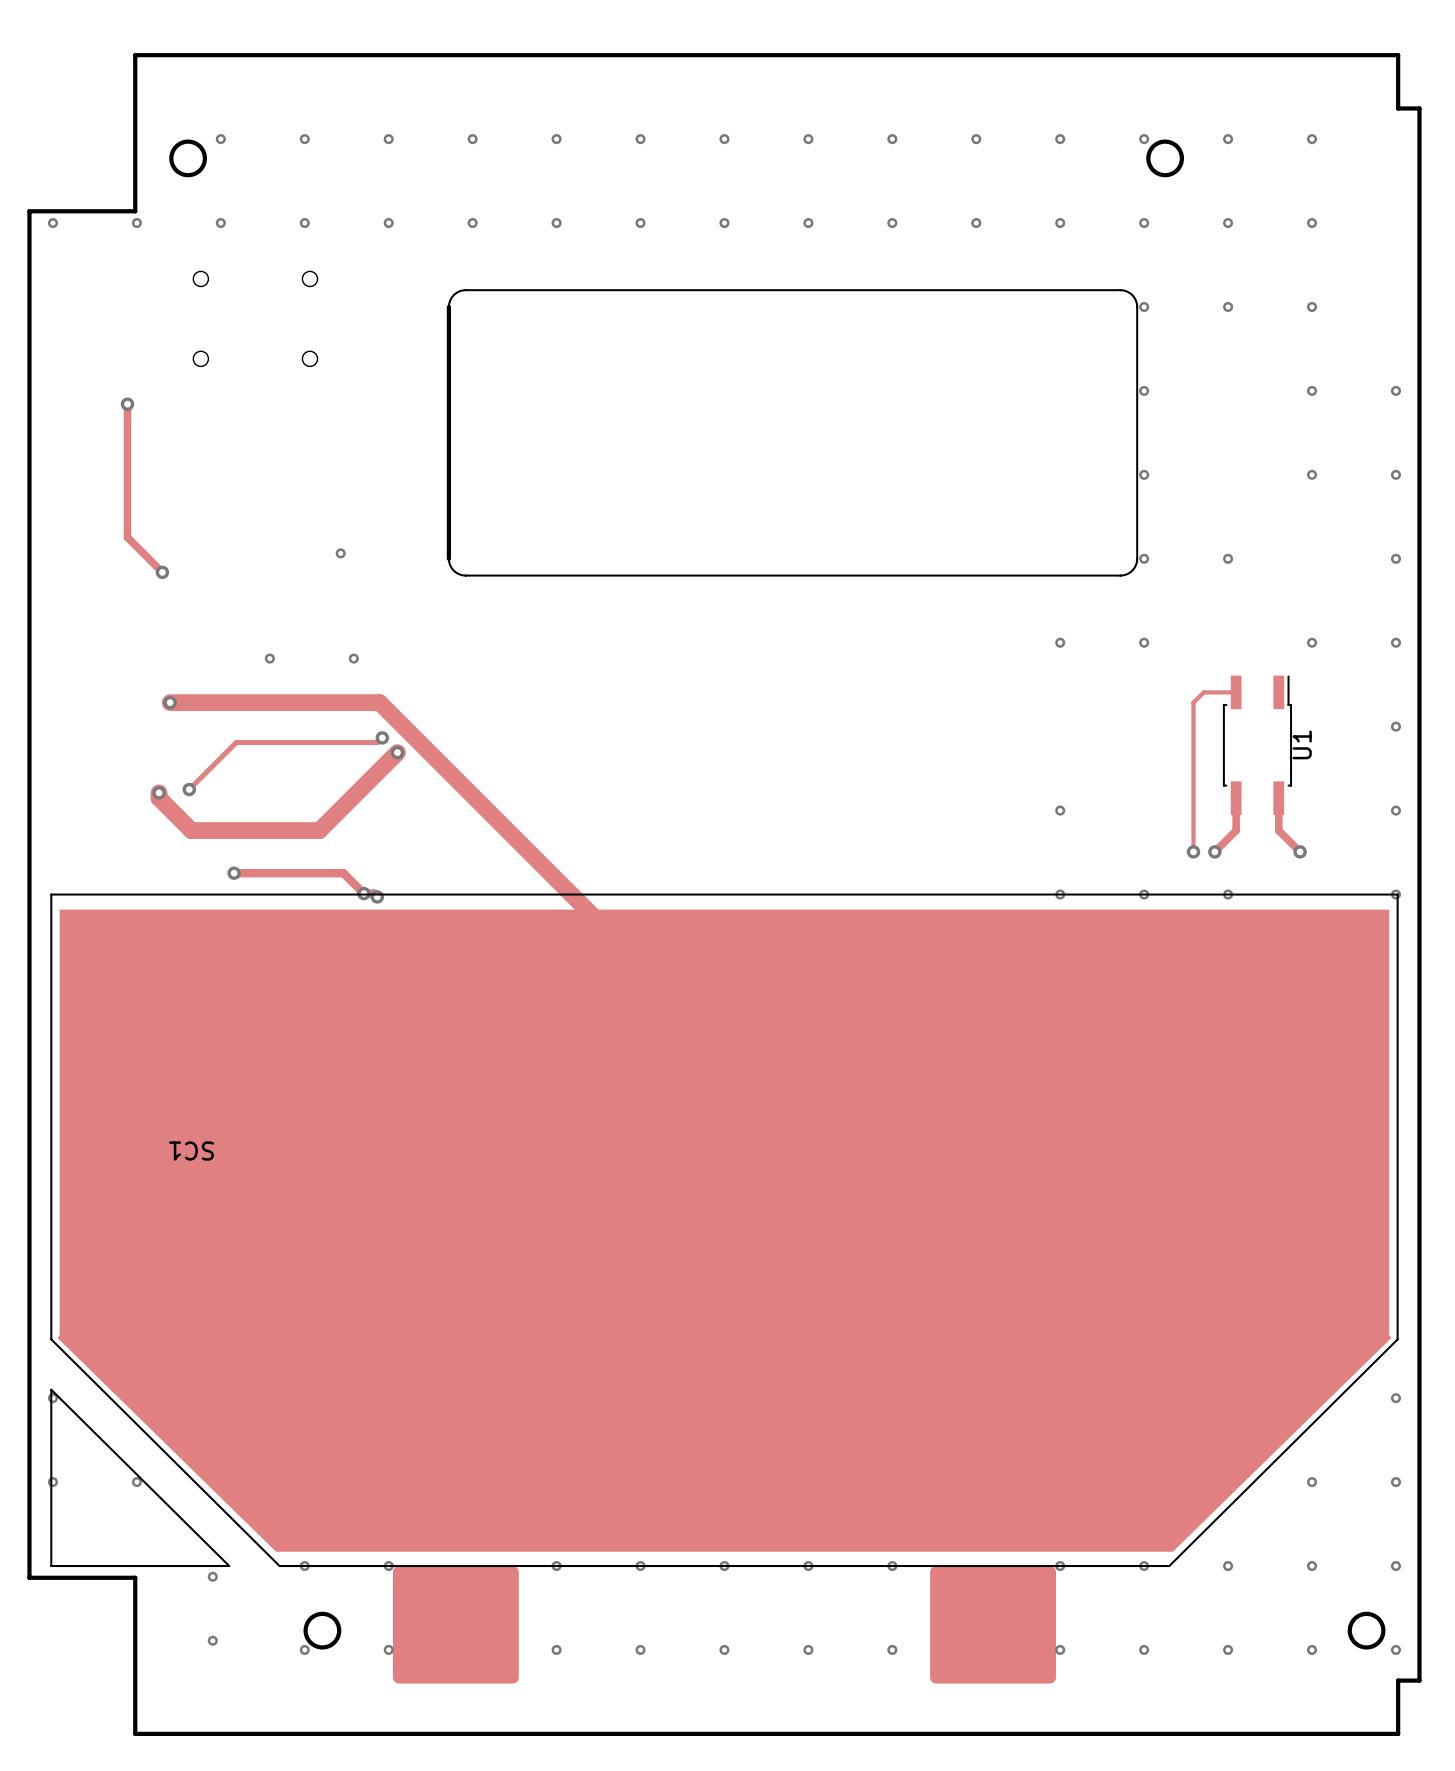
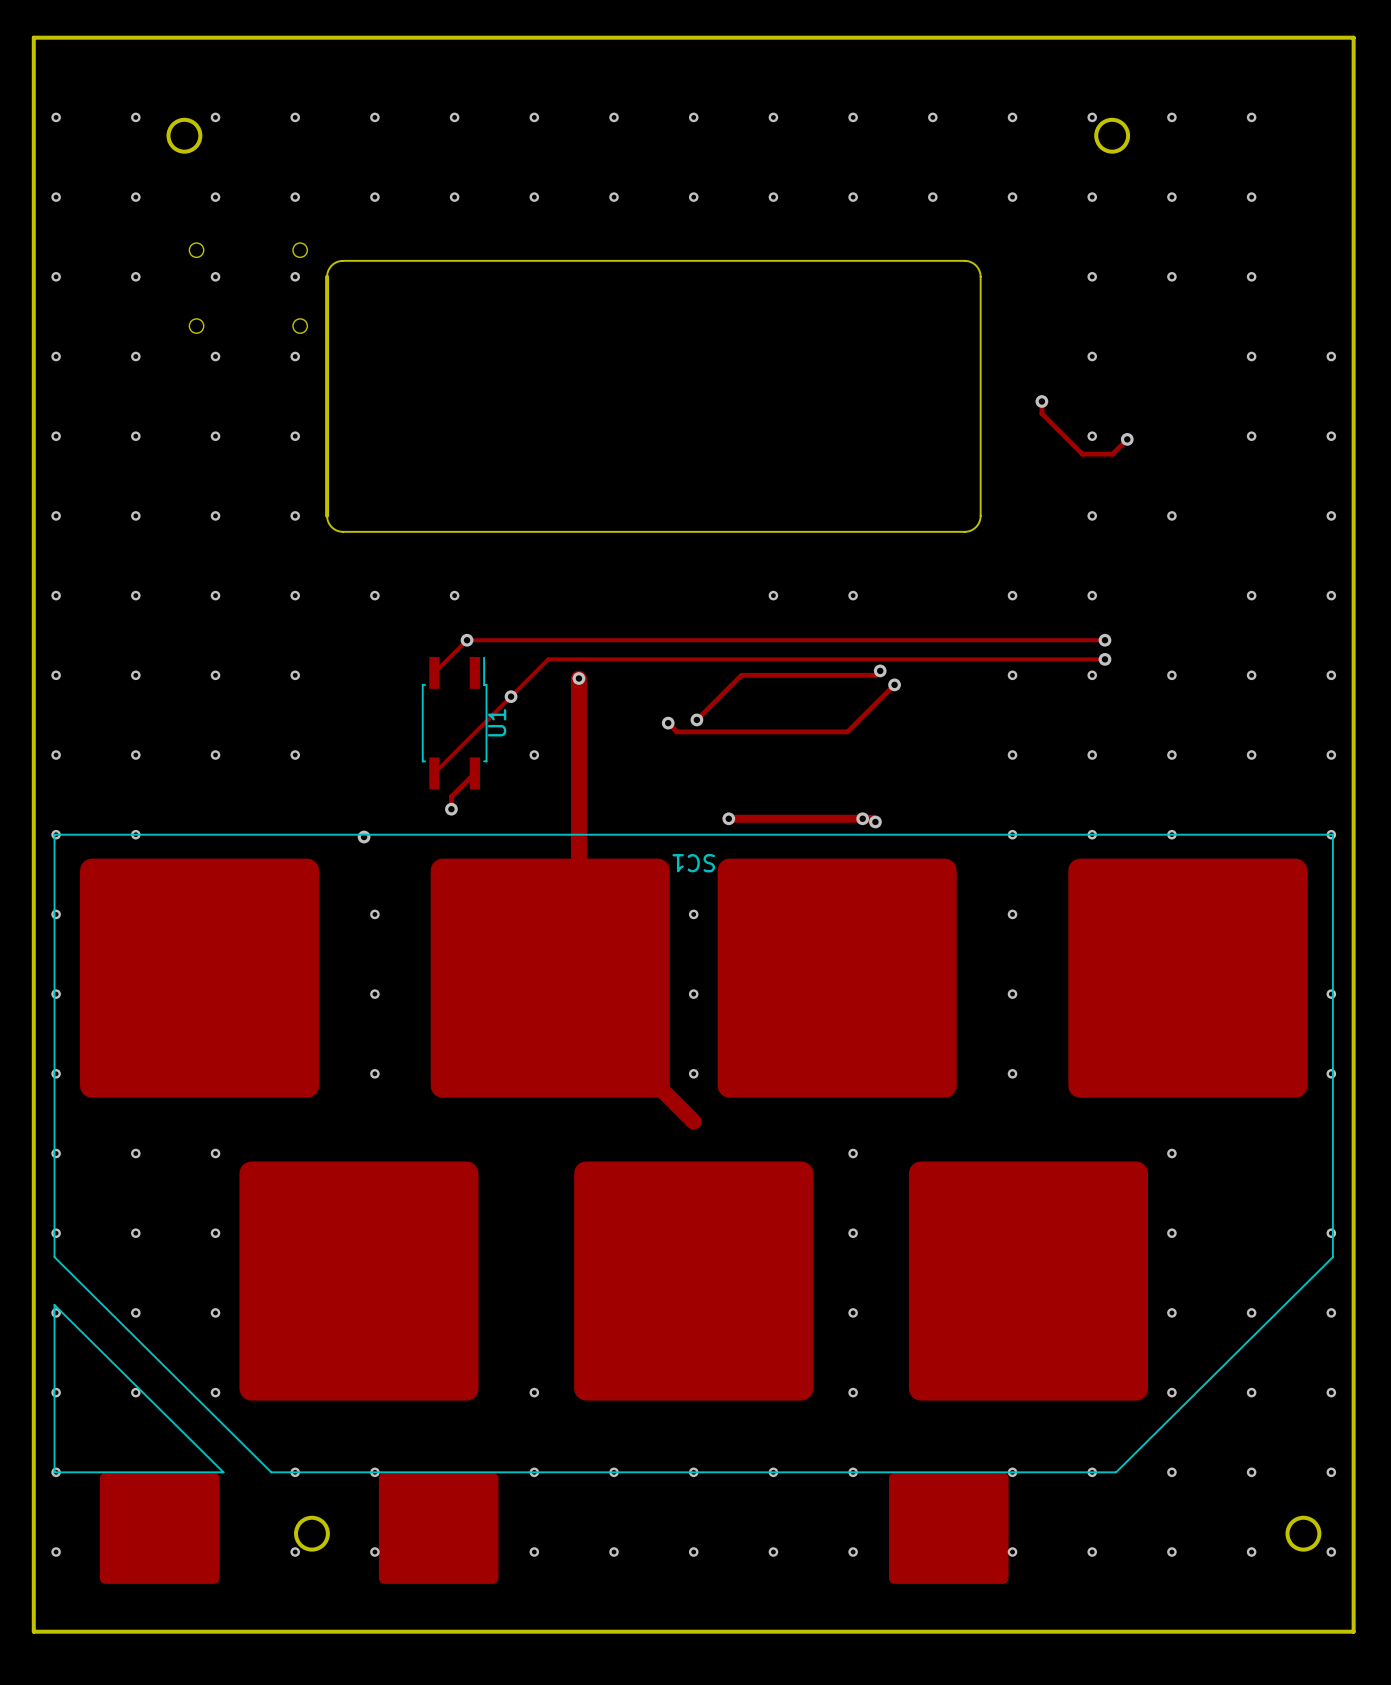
drawing shape: [27, 53, 1422, 1736] -> [31, 35, 1356, 1634]
via: none -> (56, 117)
via: none -> (135, 117)
via: none -> (56, 276)
via: none -> (135, 276)
via: none -> (215, 276)
via: none -> (295, 276)
via: none -> (56, 356)
via: none -> (135, 356)
via: none -> (215, 356)
via: none -> (295, 356)
track: (127, 404) (127, 537) (162, 572) -> none
via: (127, 404) -> none
track: none -> (1041, 401) (1041, 413) (1082, 454) (1112, 454) (1127, 439)
via: none -> (1041, 401)
via: none -> (56, 436)
via: none -> (135, 436)
via: none -> (215, 436)
via: none -> (295, 436)
via: none -> (1127, 439)
via position: (340, 553) -> (295, 515)
via: none -> (56, 515)
via: none -> (135, 515)
via: none -> (215, 515)
via: (162, 572) -> none
via: none -> (56, 595)
via: none -> (135, 595)
via: none -> (215, 595)
via: none -> (295, 595)
via: none -> (374, 595)
via: none -> (454, 595)
via: none -> (773, 595)
via: none -> (853, 595)
via: (269, 658) -> none
via: (353, 658) -> none
via: none -> (467, 640)
track: none -> (1104, 640) (467, 640) (434, 672)
via: none -> (1104, 640)
track: (1236, 692) (1203, 692) (1193, 702) (1193, 851) -> none
track: (170, 702) (379, 702) (724, 1047) (724, 1123) -> none
via: (170, 702) -> none
track: none -> (1104, 659) (548, 659) (434, 773)
via: none -> (1104, 659)
track: none -> (880, 670) (875, 675) (741, 675) (696, 719)
via: none -> (880, 670)
via: none -> (56, 675)
via: none -> (135, 675)
via: none -> (215, 675)
via: none -> (295, 675)
via: none -> (1012, 675)
via: none -> (1092, 675)
via: none -> (1171, 675)
via: none -> (1251, 675)
track: none -> (578, 678) (578, 949) (550, 978) (693, 1121)
via: none -> (578, 678)
track: none -> (894, 684) (847, 731) (676, 731) (668, 723)
via: none -> (894, 684)
track: (382, 737) (377, 742) (236, 742) (189, 789) -> none
via: (382, 737) -> none
U1 position: (1257, 745) -> (454, 723)
via: none -> (511, 696)
track: (397, 752) (319, 830) (191, 830) (159, 798) (159, 792) -> none
via: (397, 752) -> none
via: none -> (696, 719)
via: none -> (668, 723)
via: (189, 789) -> none
via: (159, 792) -> none
track: (1236, 798) (1236, 830) (1214, 851) -> none
track: (1278, 798) (1278, 830) (1300, 851) -> none
via: none -> (56, 755)
via: none -> (135, 755)
via: none -> (215, 755)
via: none -> (295, 755)
via: none -> (534, 755)
via: none -> (1092, 755)
via: none -> (1171, 755)
via: none -> (1251, 755)
track: none -> (474, 773) (451, 796) (451, 809)
via: (1193, 851) -> none
via: (1214, 851) -> none
via: (1300, 851) -> none
via: none -> (451, 809)
track: (234, 873) (343, 873) (363, 893) (373, 893) (377, 896) -> none
via: (234, 873) -> none
track: none -> (728, 818) (872, 818) (875, 821)
via: none -> (728, 818)
via: none -> (862, 818)
via: none -> (875, 821)
SC1 footprint: [50, 893, 1399, 1684] -> [53, 833, 1334, 1584]
via: (363, 893) -> none
via: none -> (56, 834)
via: none -> (135, 834)
via: none -> (56, 914)
via: none -> (374, 914)
via: none -> (693, 914)
via: none -> (1012, 914)
via: none -> (56, 994)
via: none -> (374, 994)
via: none -> (693, 994)
via: none -> (1012, 994)
via: none -> (1331, 994)
via: none -> (56, 1073)
via: none -> (374, 1073)
via: none -> (693, 1073)
via: none -> (1012, 1073)
via: none -> (1331, 1073)
SC1 name position: SC1 (191, 1151) -> SC1 (693, 863)
via: none -> (56, 1153)
via: none -> (135, 1153)
via: none -> (215, 1153)
via: none -> (853, 1153)
via: none -> (1171, 1153)
via: none -> (56, 1233)
via: none -> (135, 1233)
via: none -> (215, 1233)
via: none -> (853, 1233)
via: none -> (1171, 1233)
via: none -> (1331, 1233)
via: none -> (135, 1312)
via: none -> (215, 1312)
via: none -> (853, 1312)
via: none -> (1171, 1312)
via: none -> (1251, 1312)
via: none -> (215, 1392)
via: none -> (534, 1392)
via: none -> (853, 1392)
via: none -> (1171, 1392)
via: none -> (56, 1472)
via: (212, 1576) -> none
via: (212, 1640) -> none
via: none -> (56, 1552)

